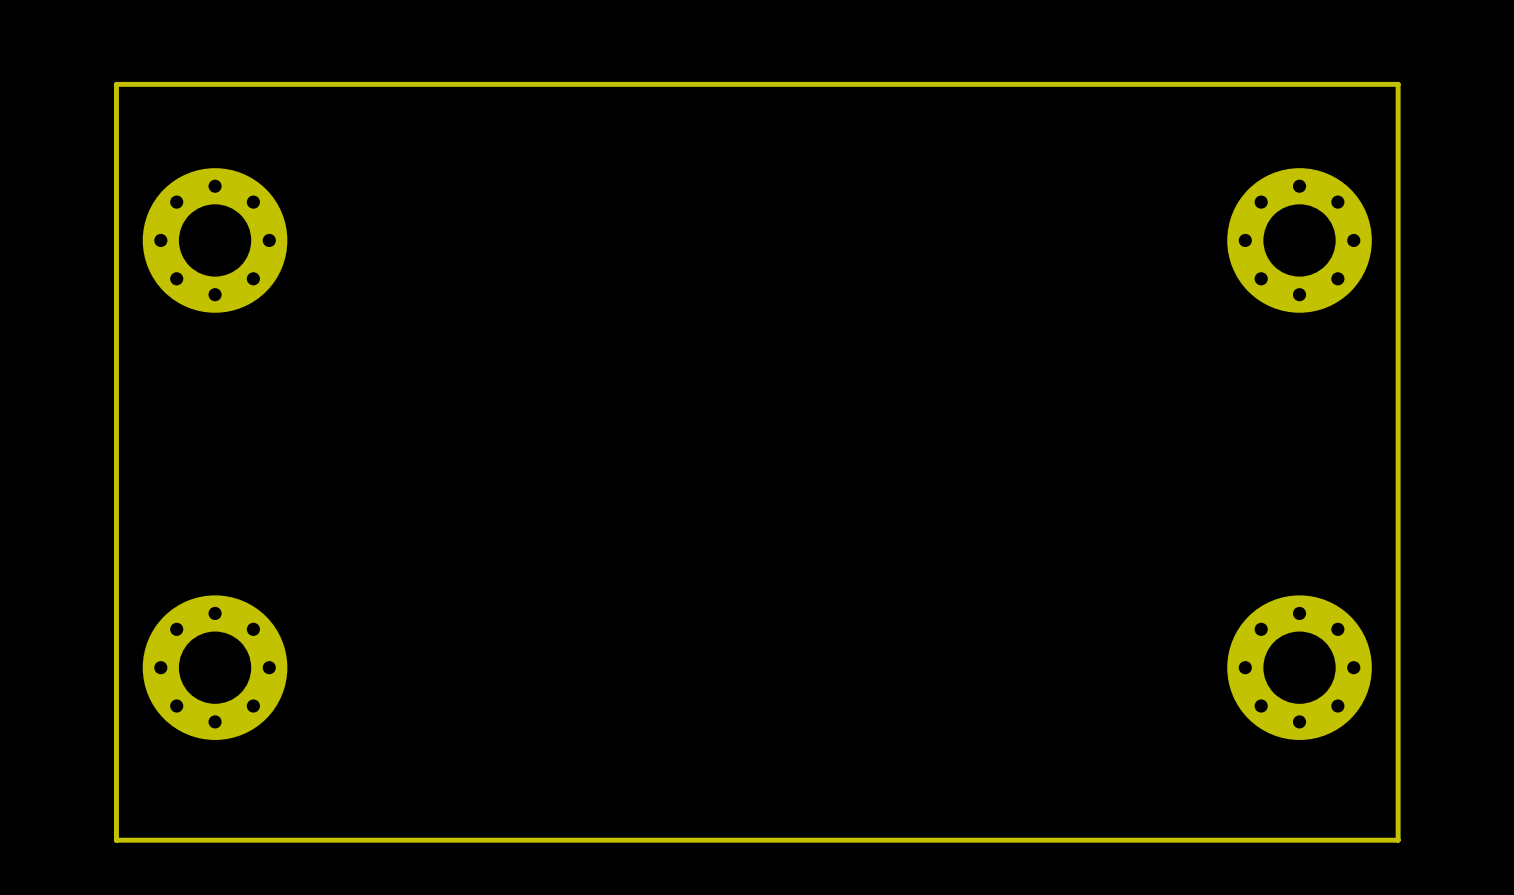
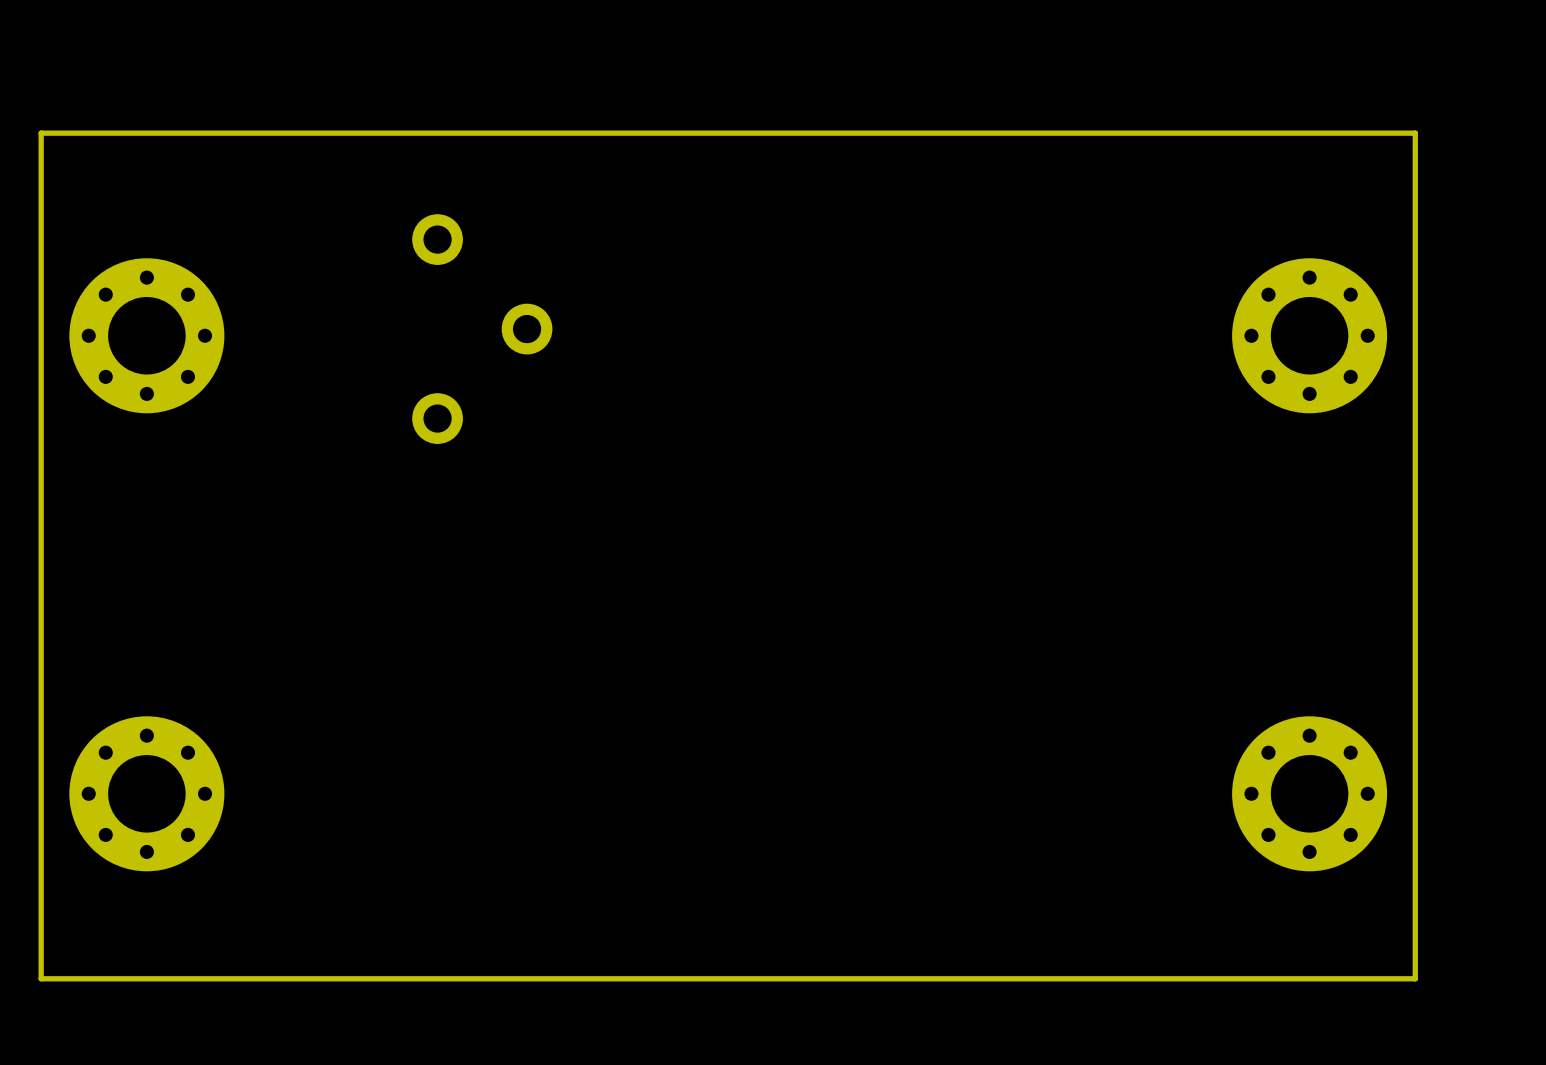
board edge: (1398, 84) (116, 84) -> (1415, 168) (1415, 133) (41, 133) (41, 168)
part: none -> (482, 329)

